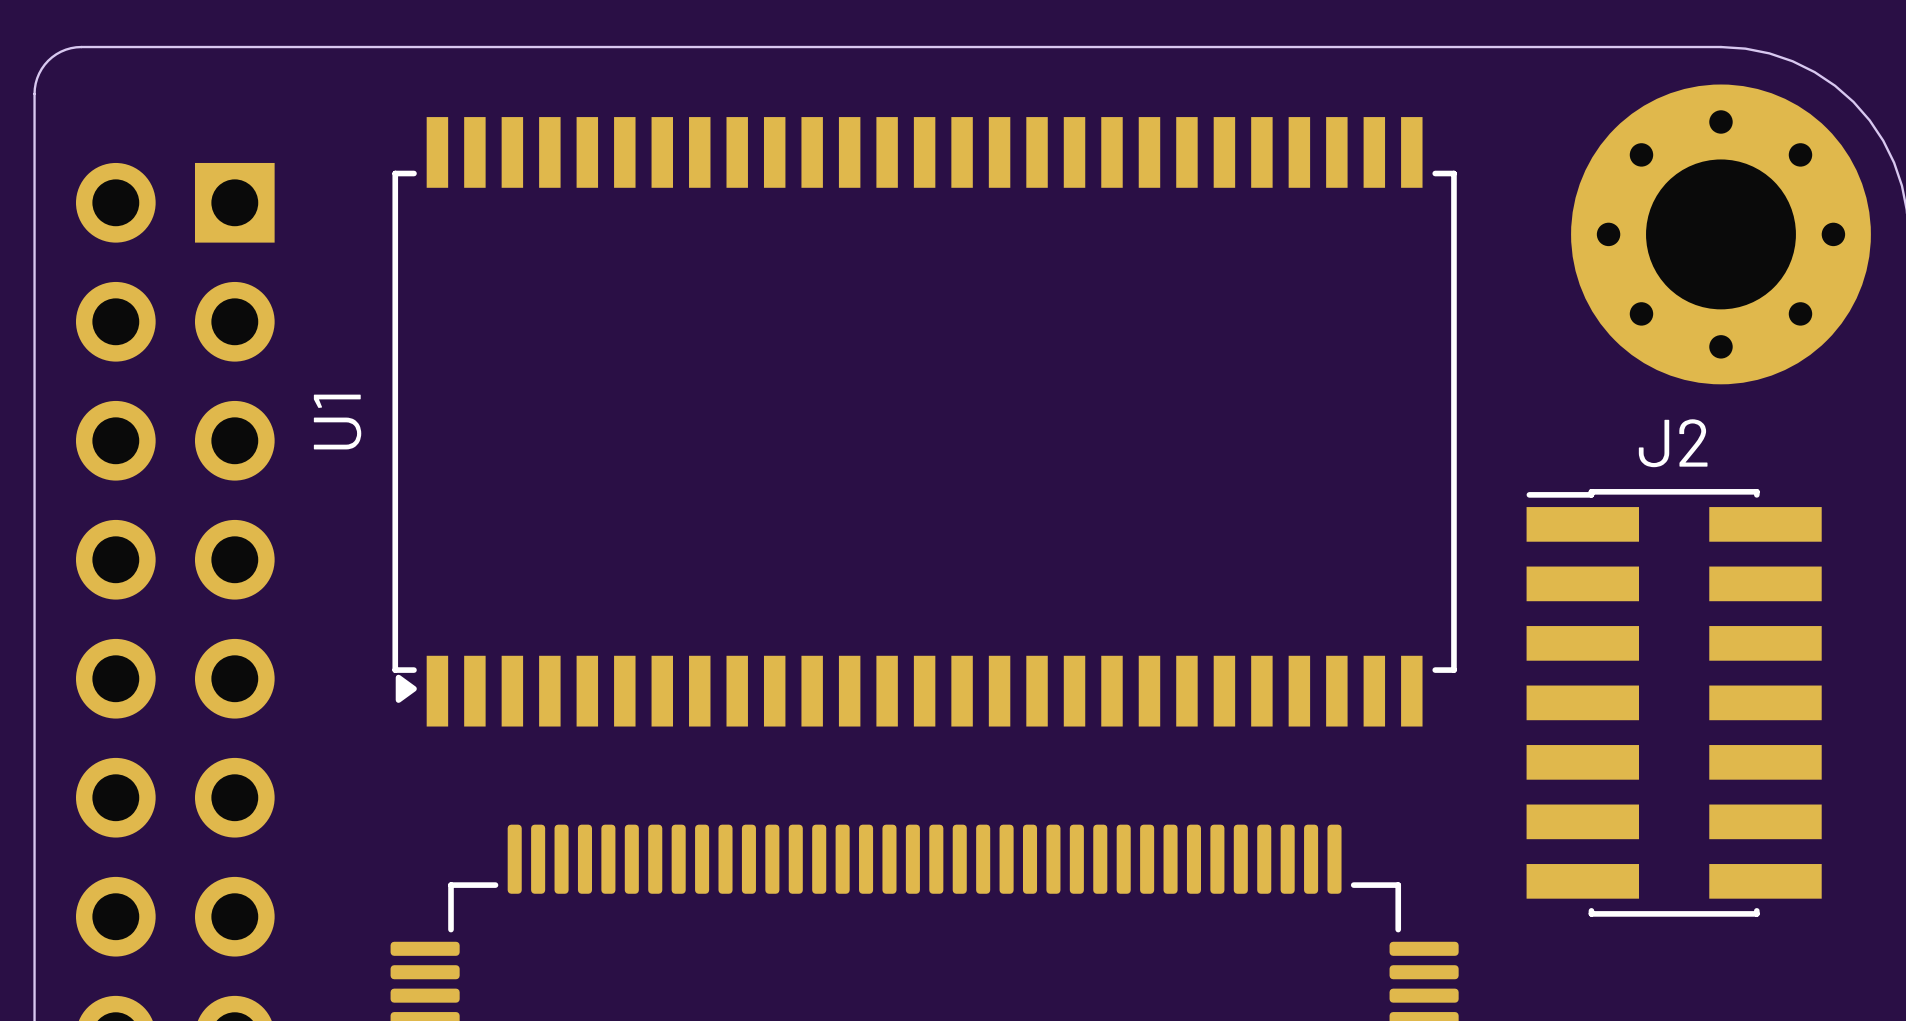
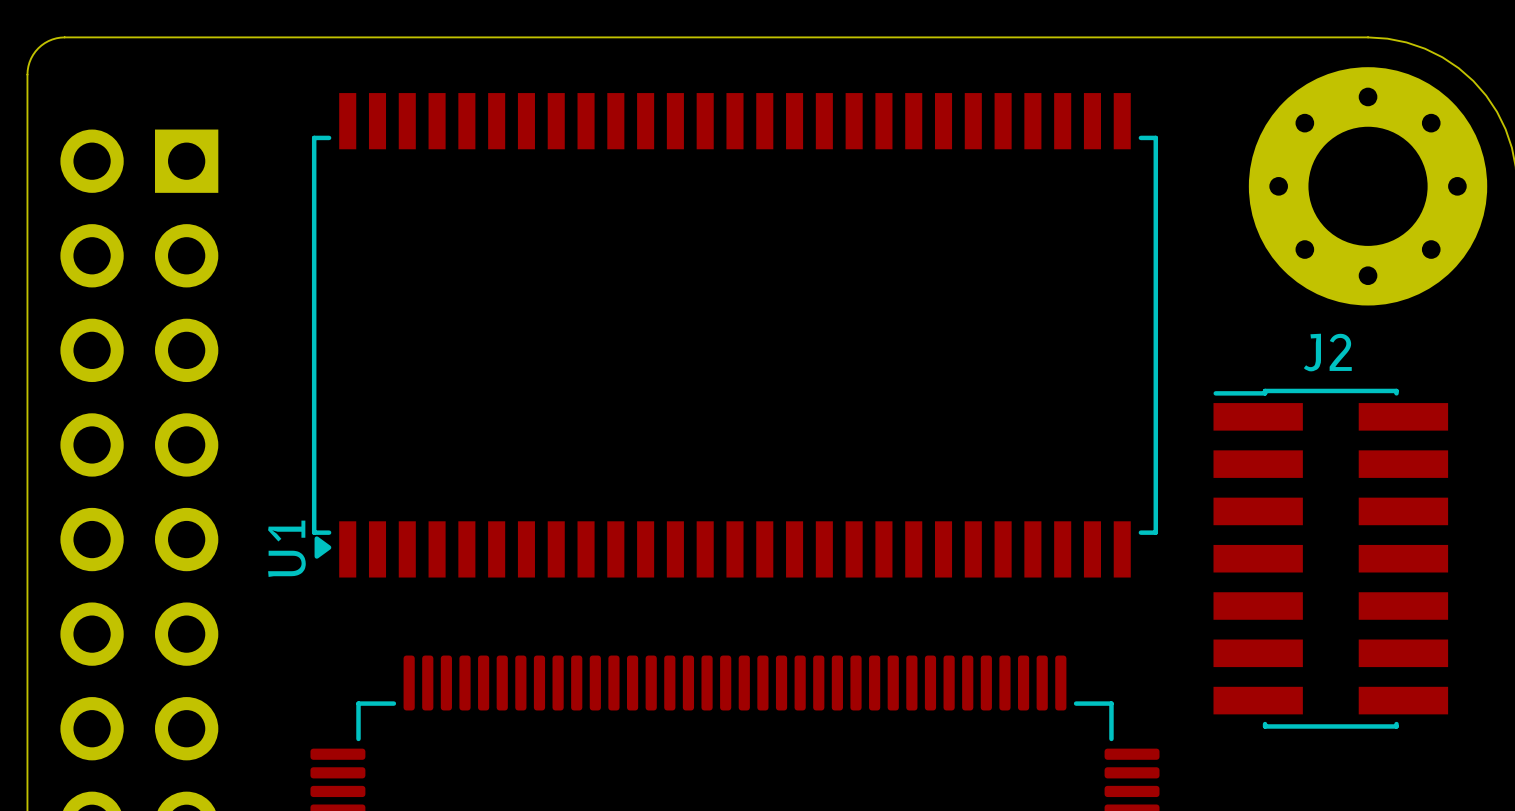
U1 name position: U1 (337, 422) -> U1 (286, 548)

